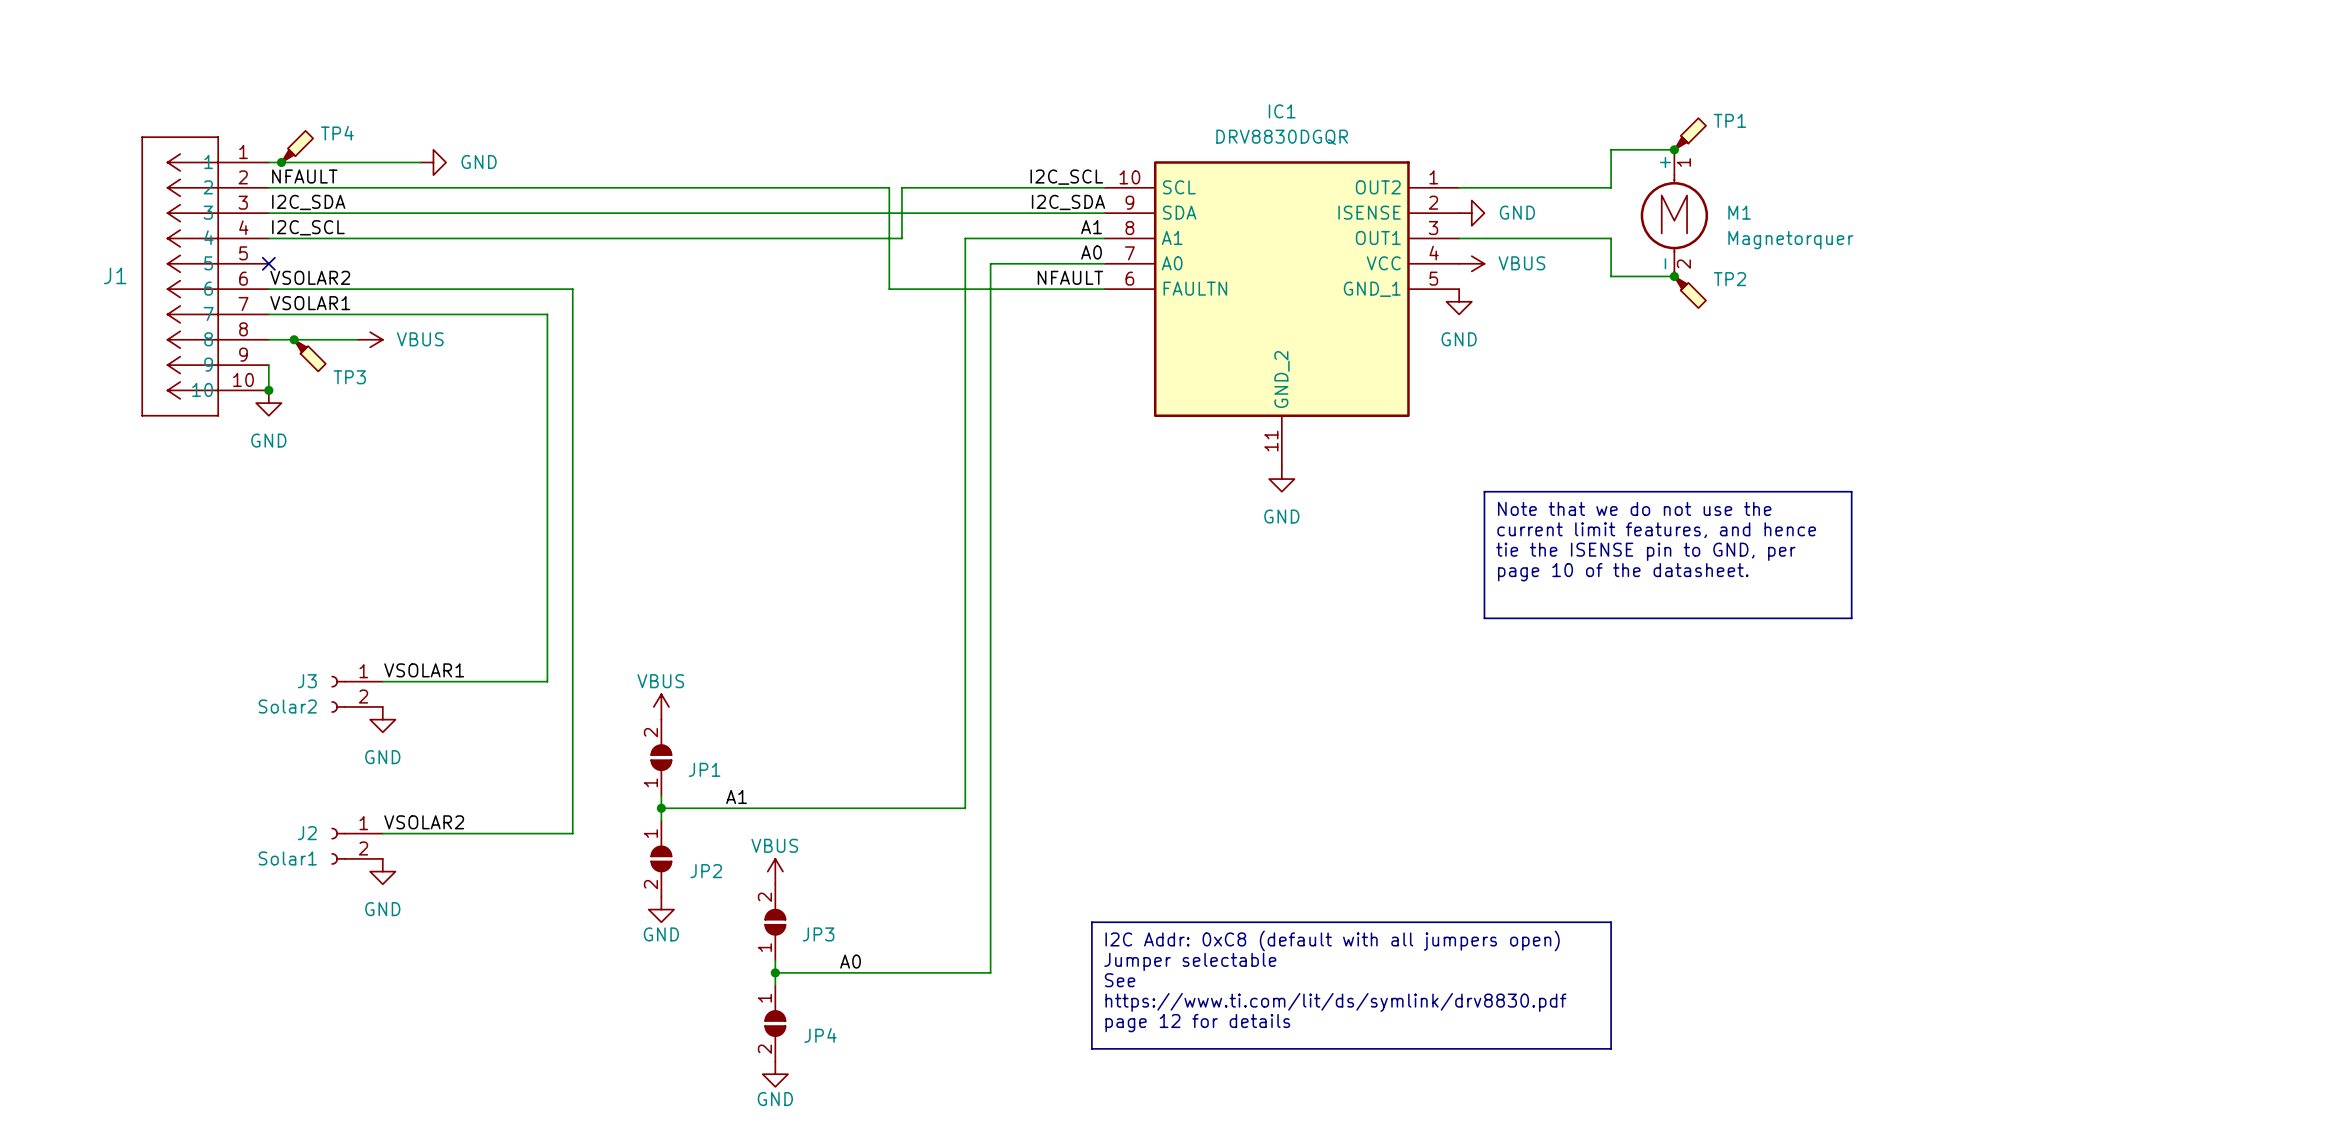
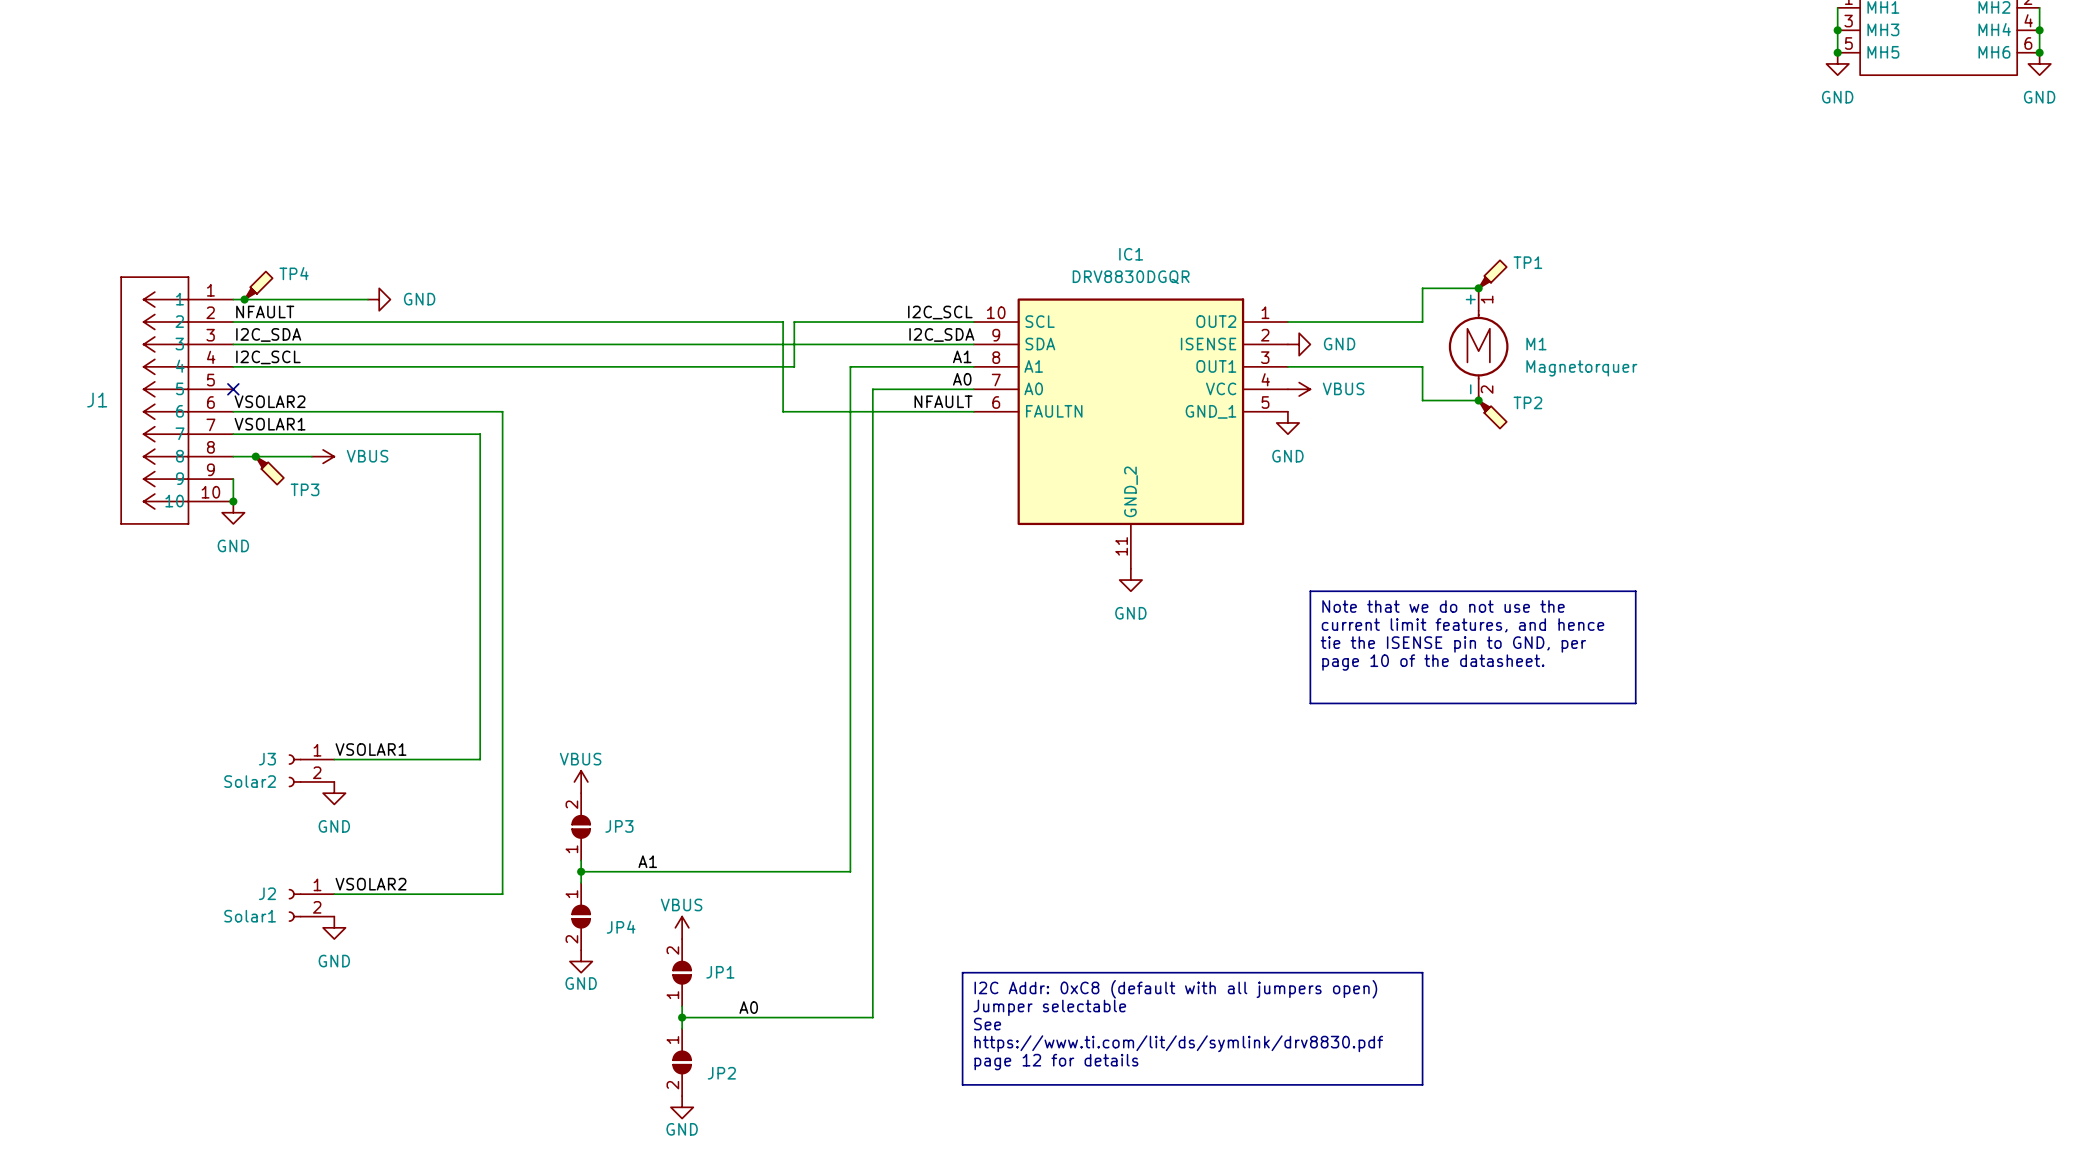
JP1 name: JP1 (704, 769) -> JP3 (619, 826)
JP2 name: JP2 (706, 871) -> JP4 (621, 927)
JP3 name: JP3 (818, 934) -> JP1 (720, 972)
JP4 name: JP4 (820, 1035) -> JP2 (721, 1073)

